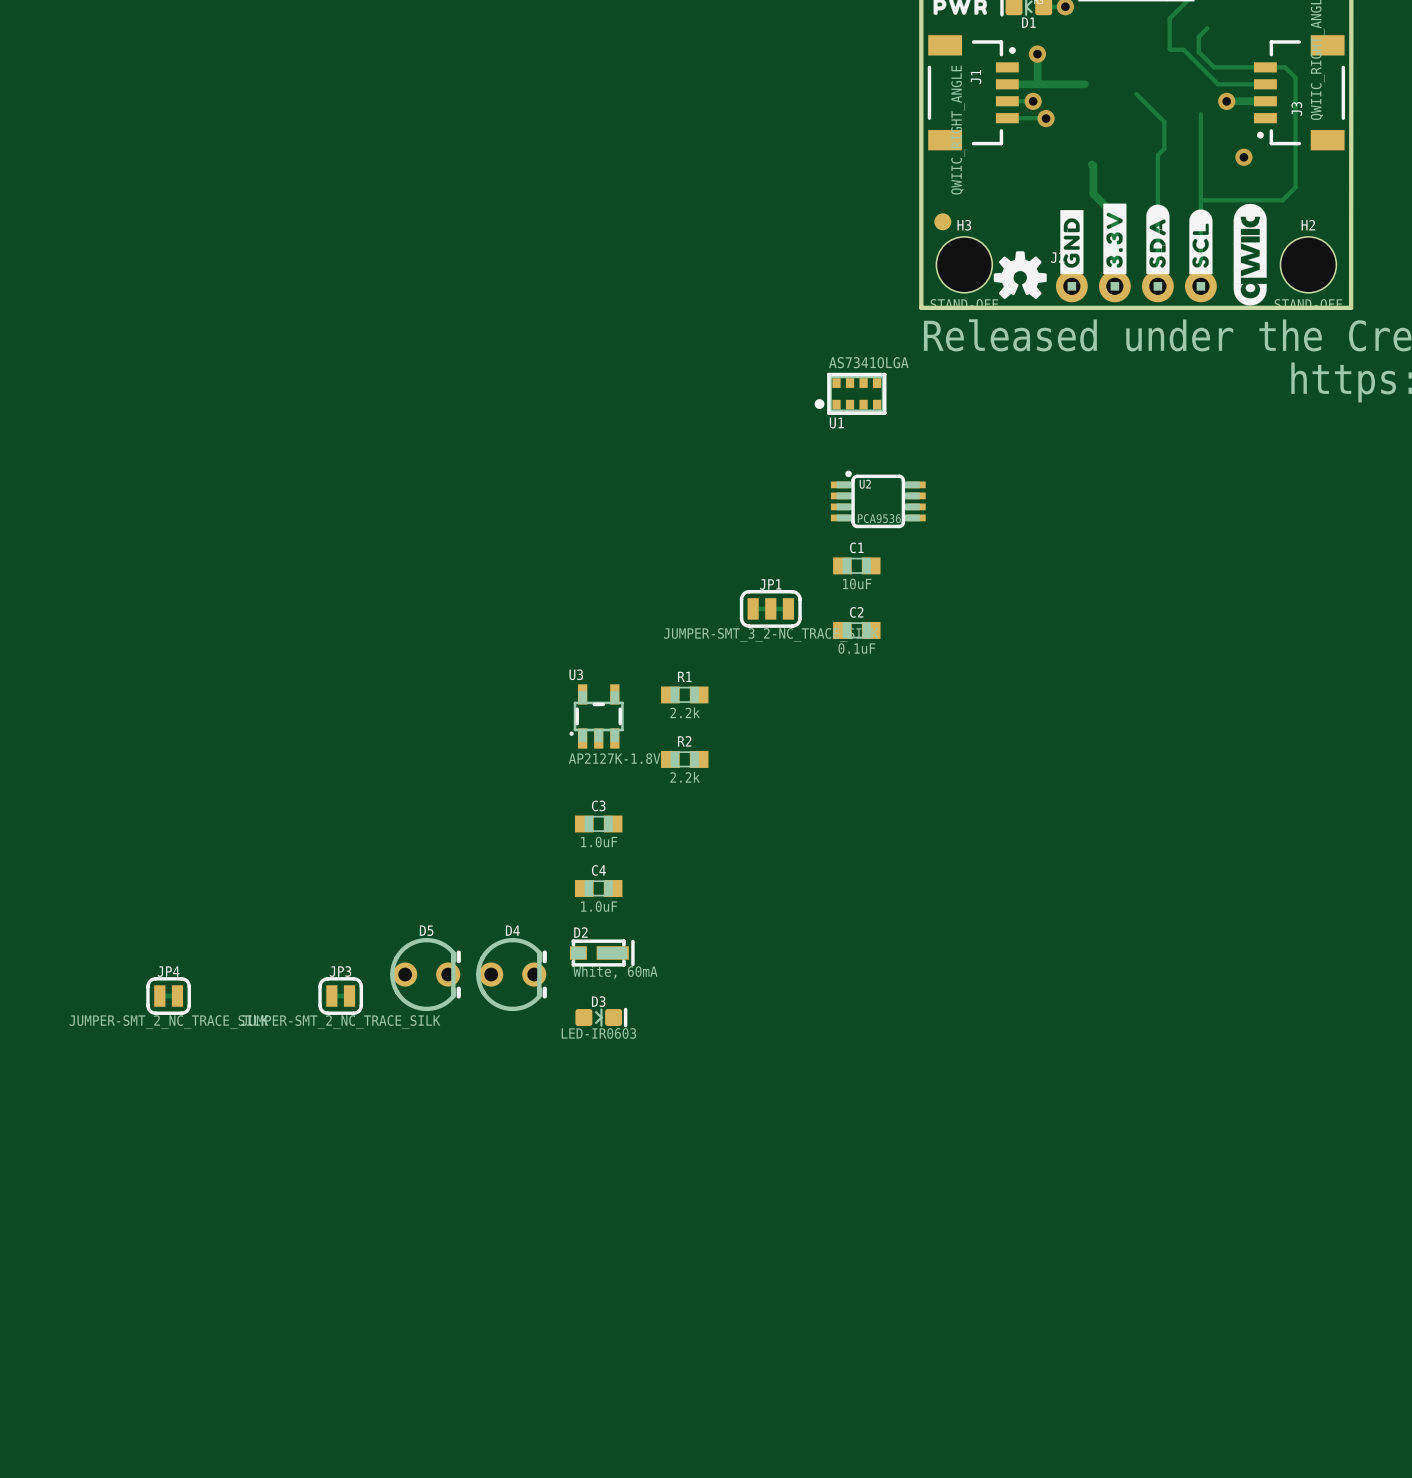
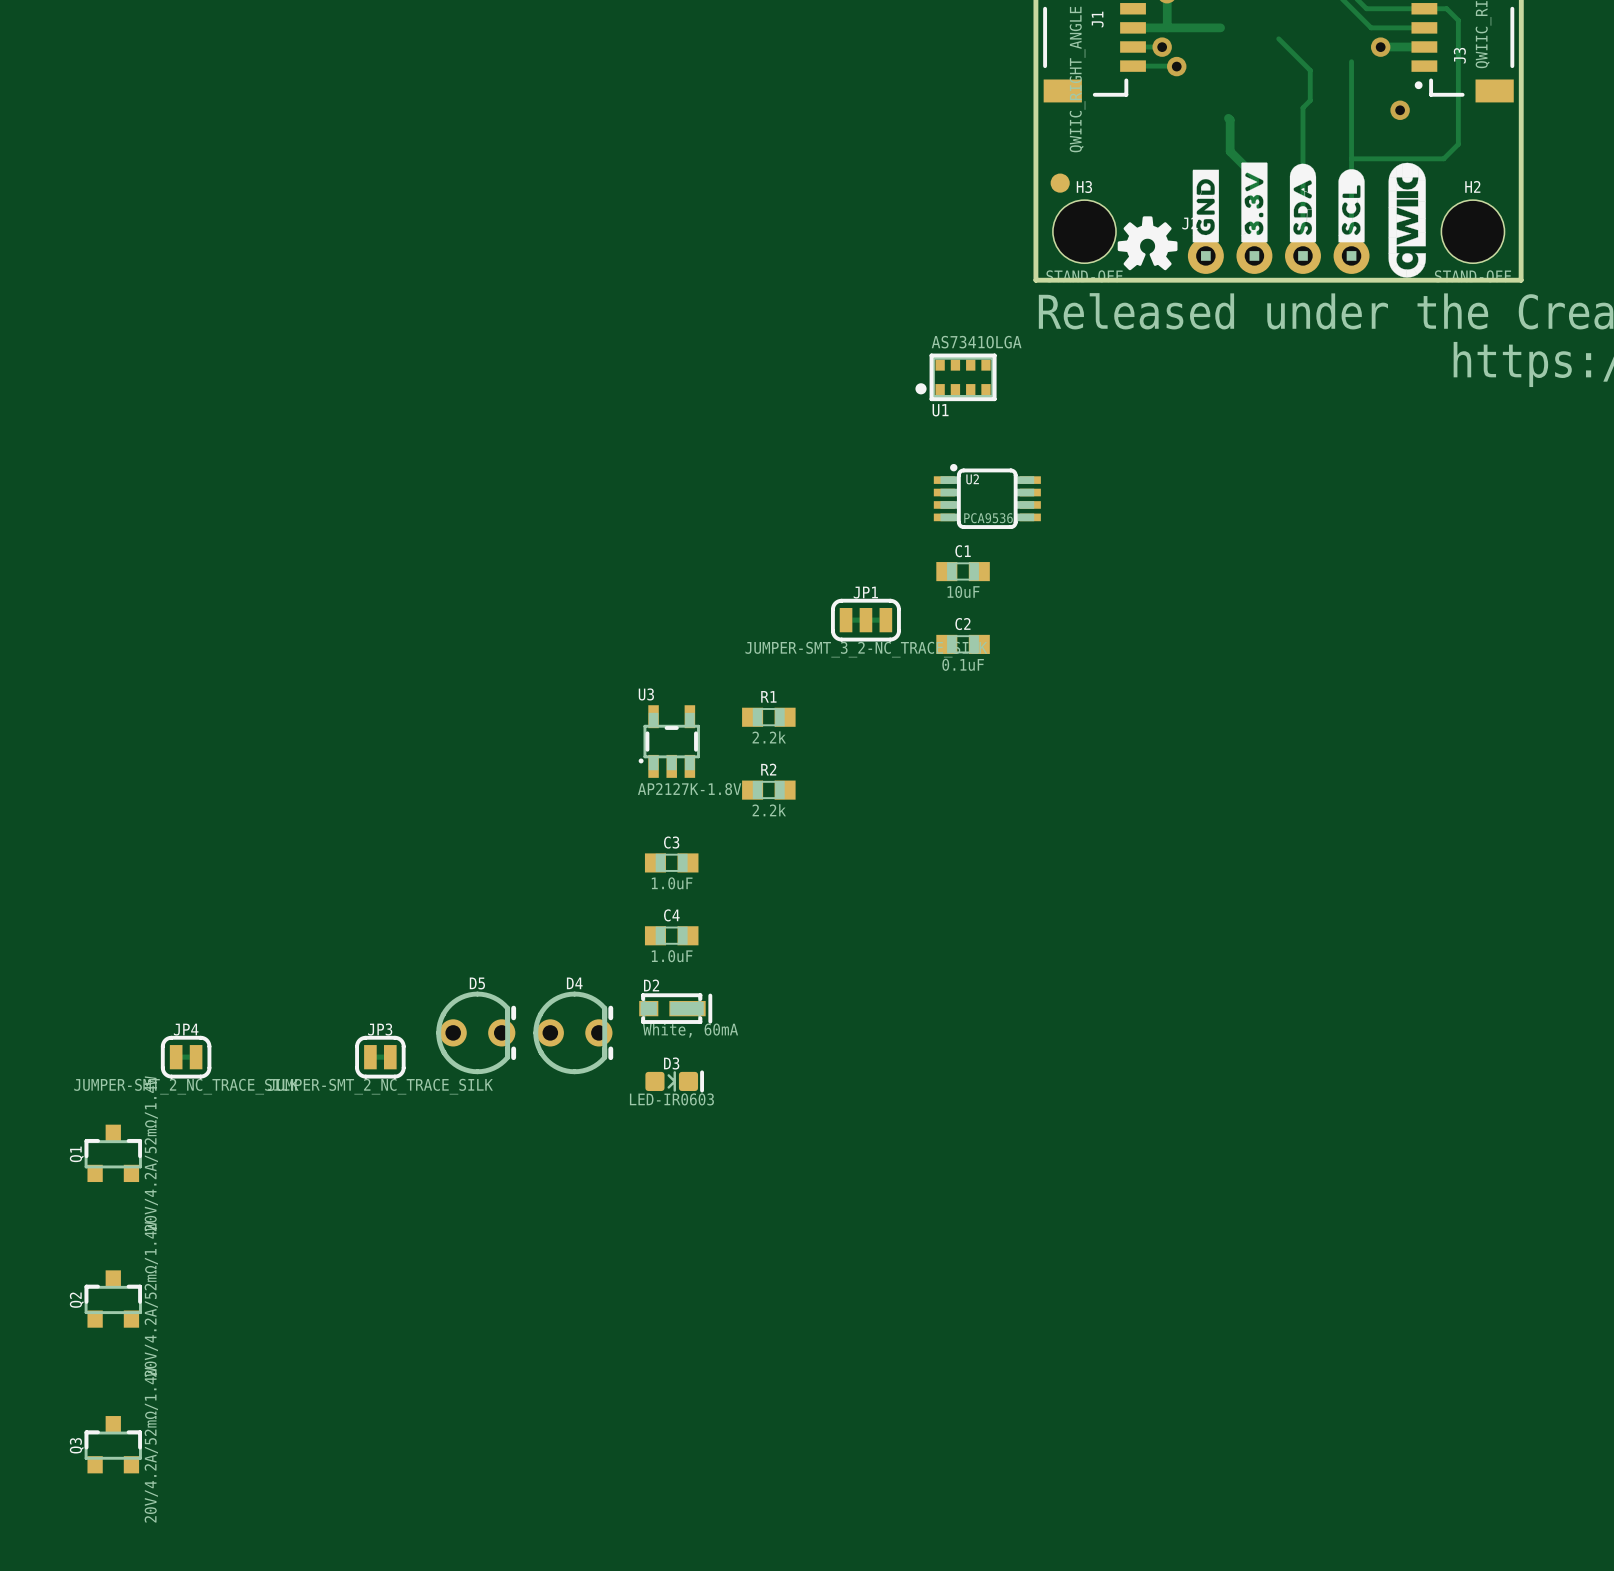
Q1: none -> 20V/4.2A/52mΩ/1.4W (113, 1153)
Q2: none -> 20V/4.2A/52mΩ/1.4W (113, 1299)
Q3: none -> 20V/4.2A/52mΩ/1.4W (113, 1444)

